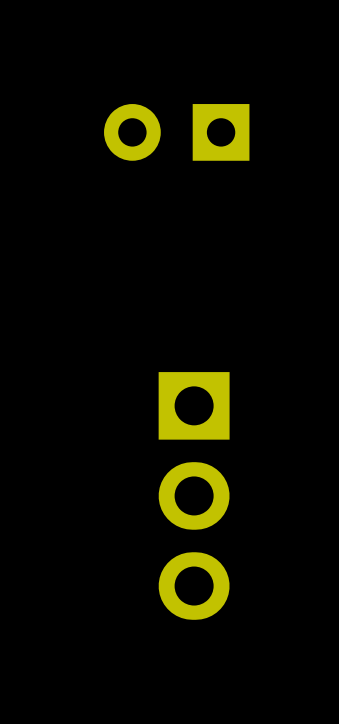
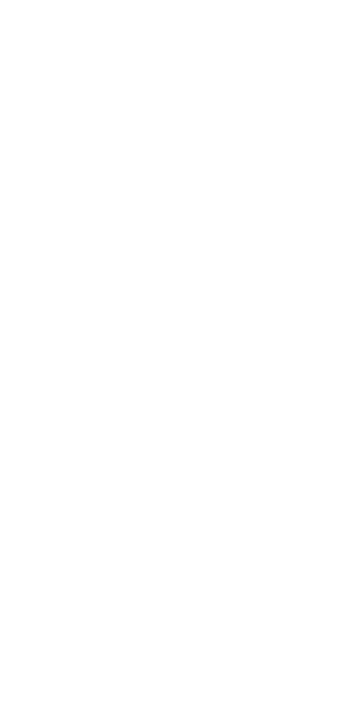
part: (176, 132) -> none
part: (194, 495) -> none

